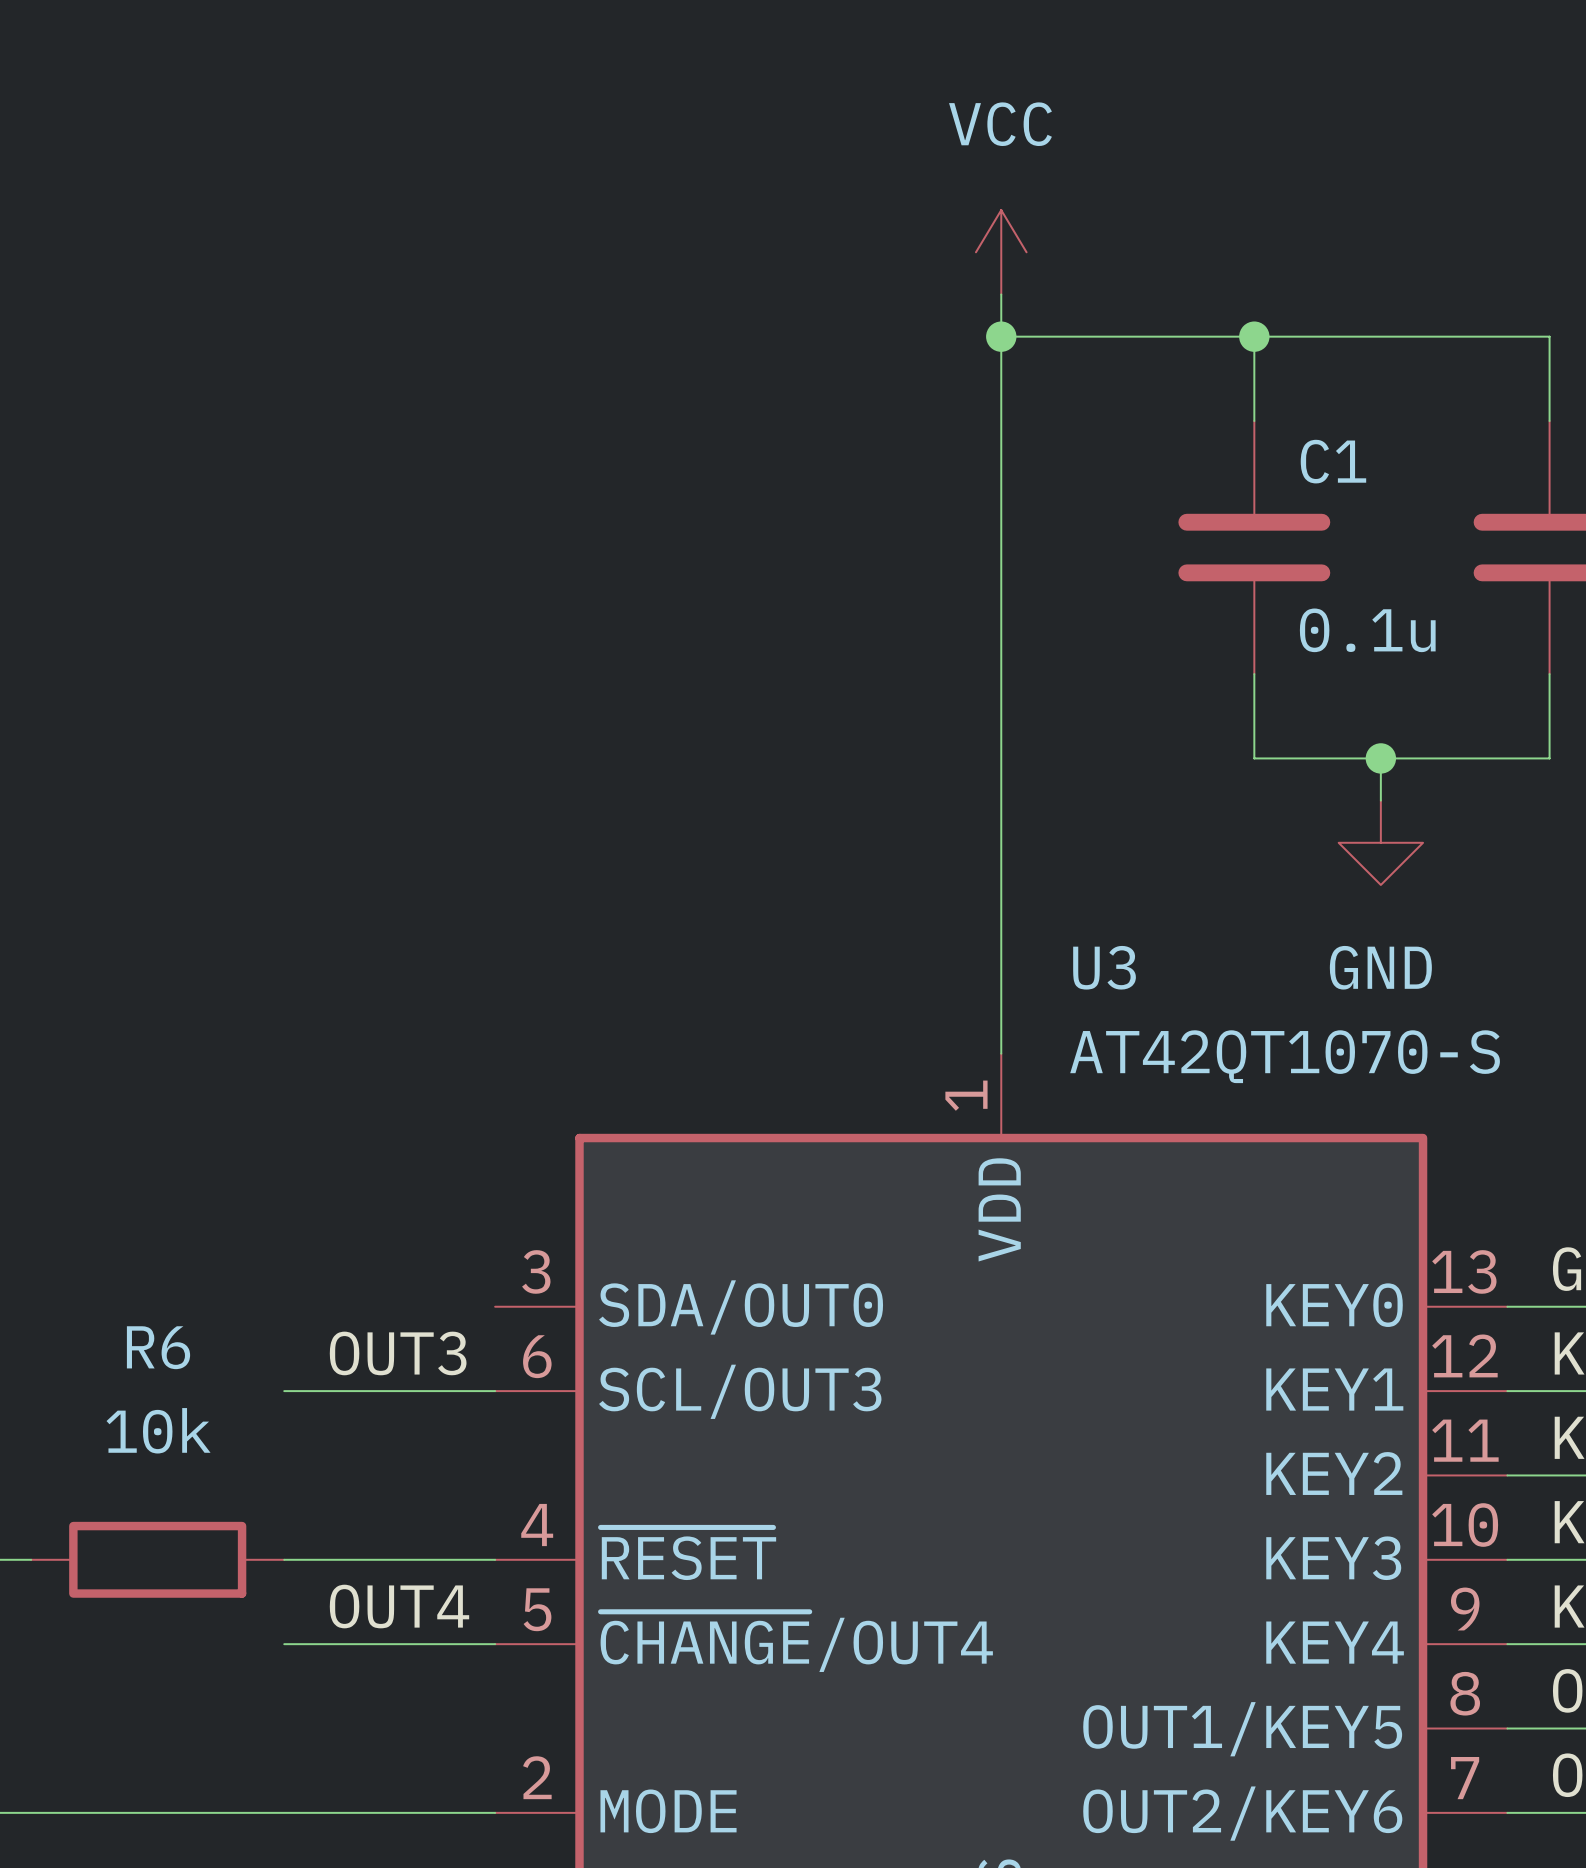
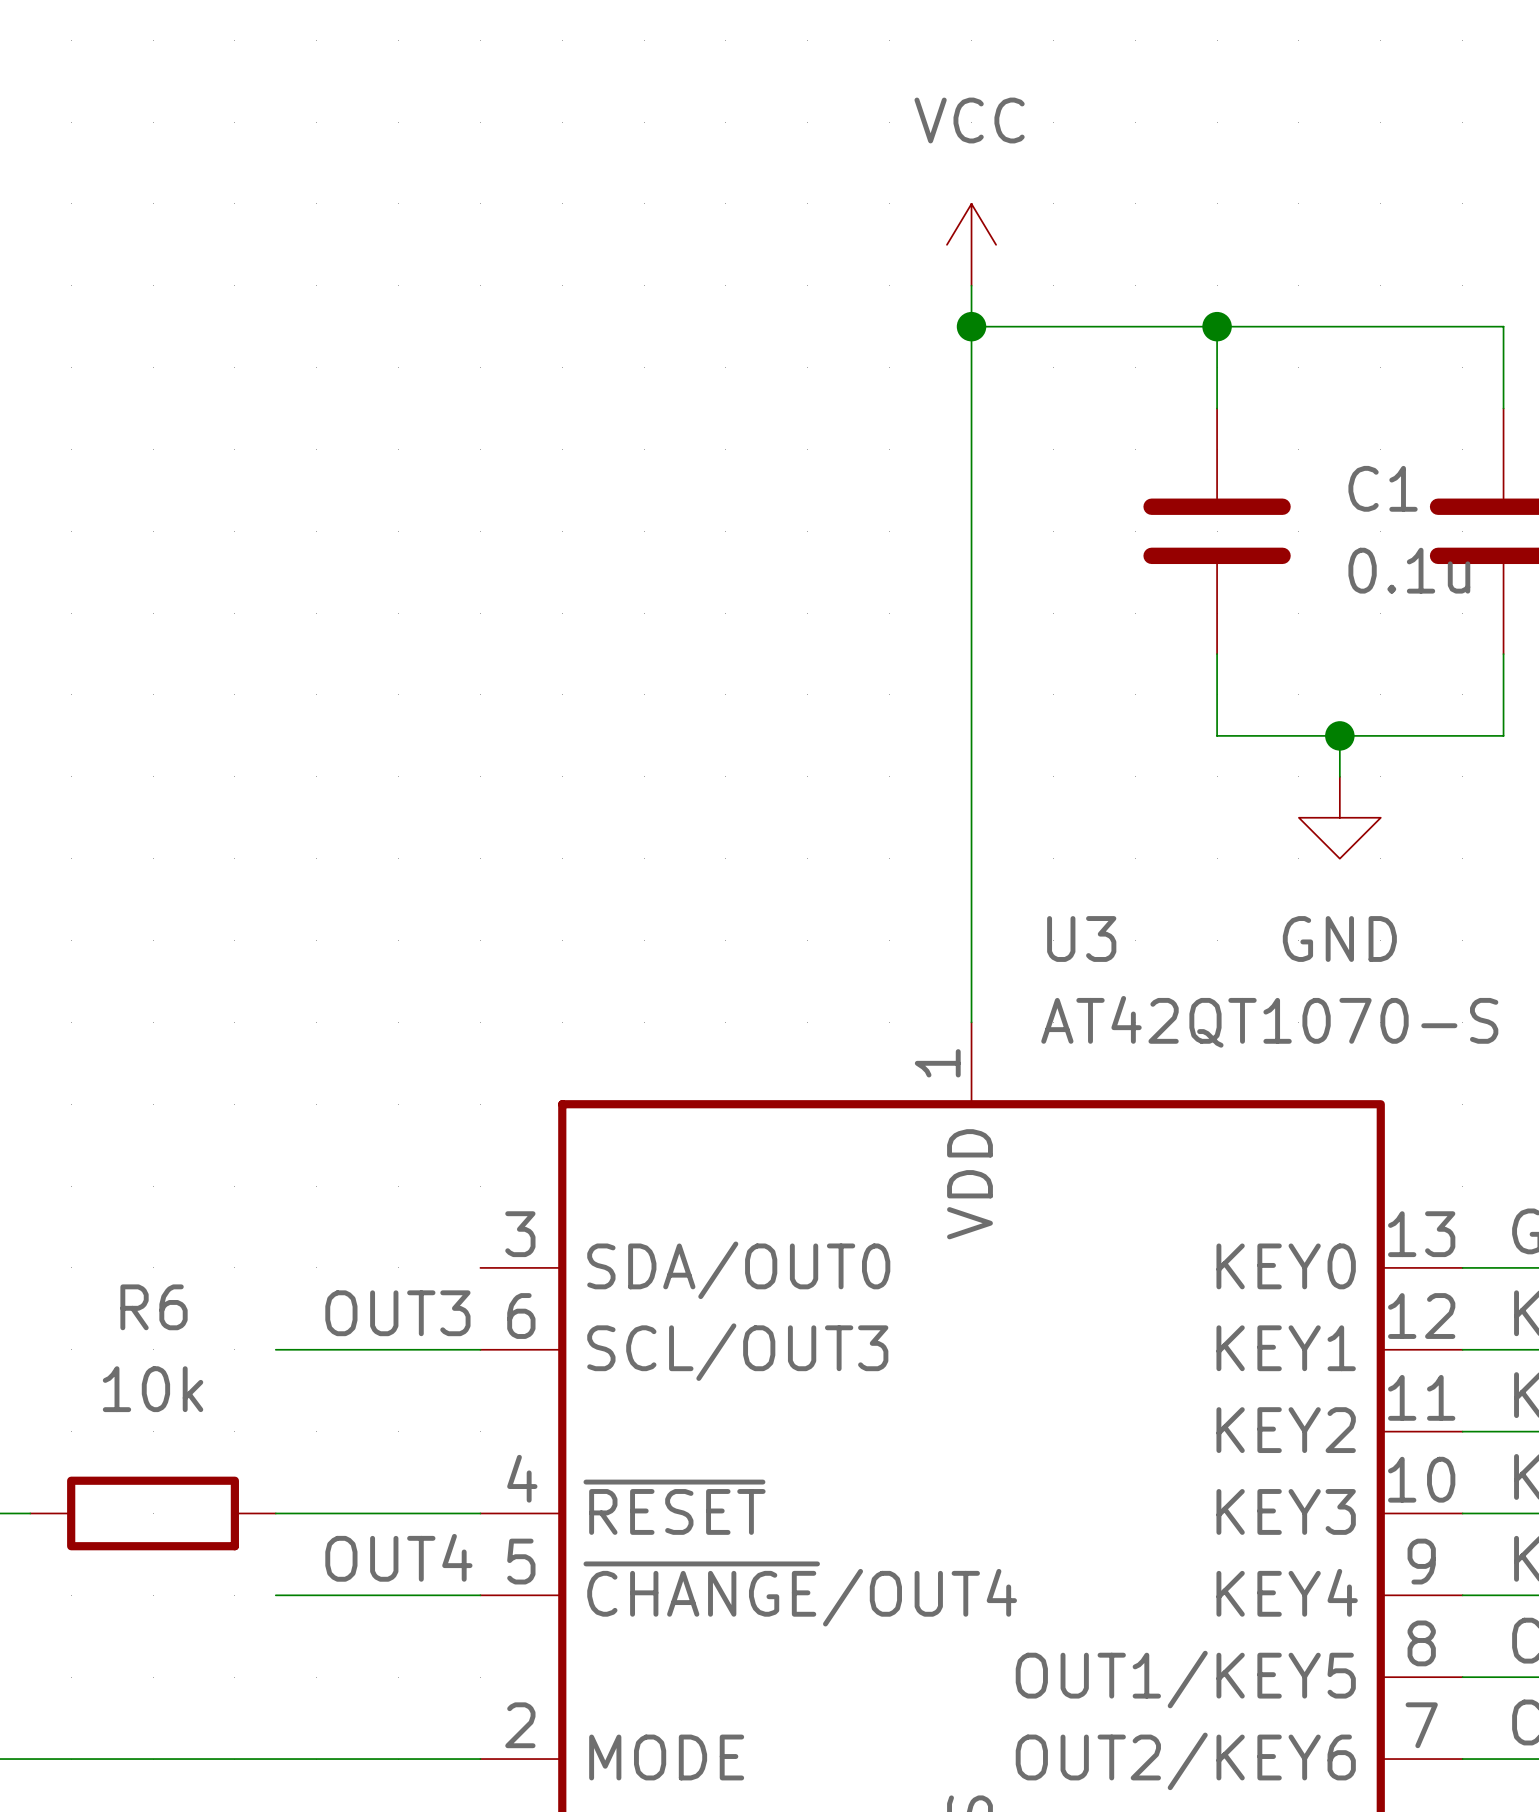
C1 name position: C1 (1333, 461) -> C1 (1383, 488)
C1 value position: 0.1u (1367, 630) -> 0.1u (1409, 570)

